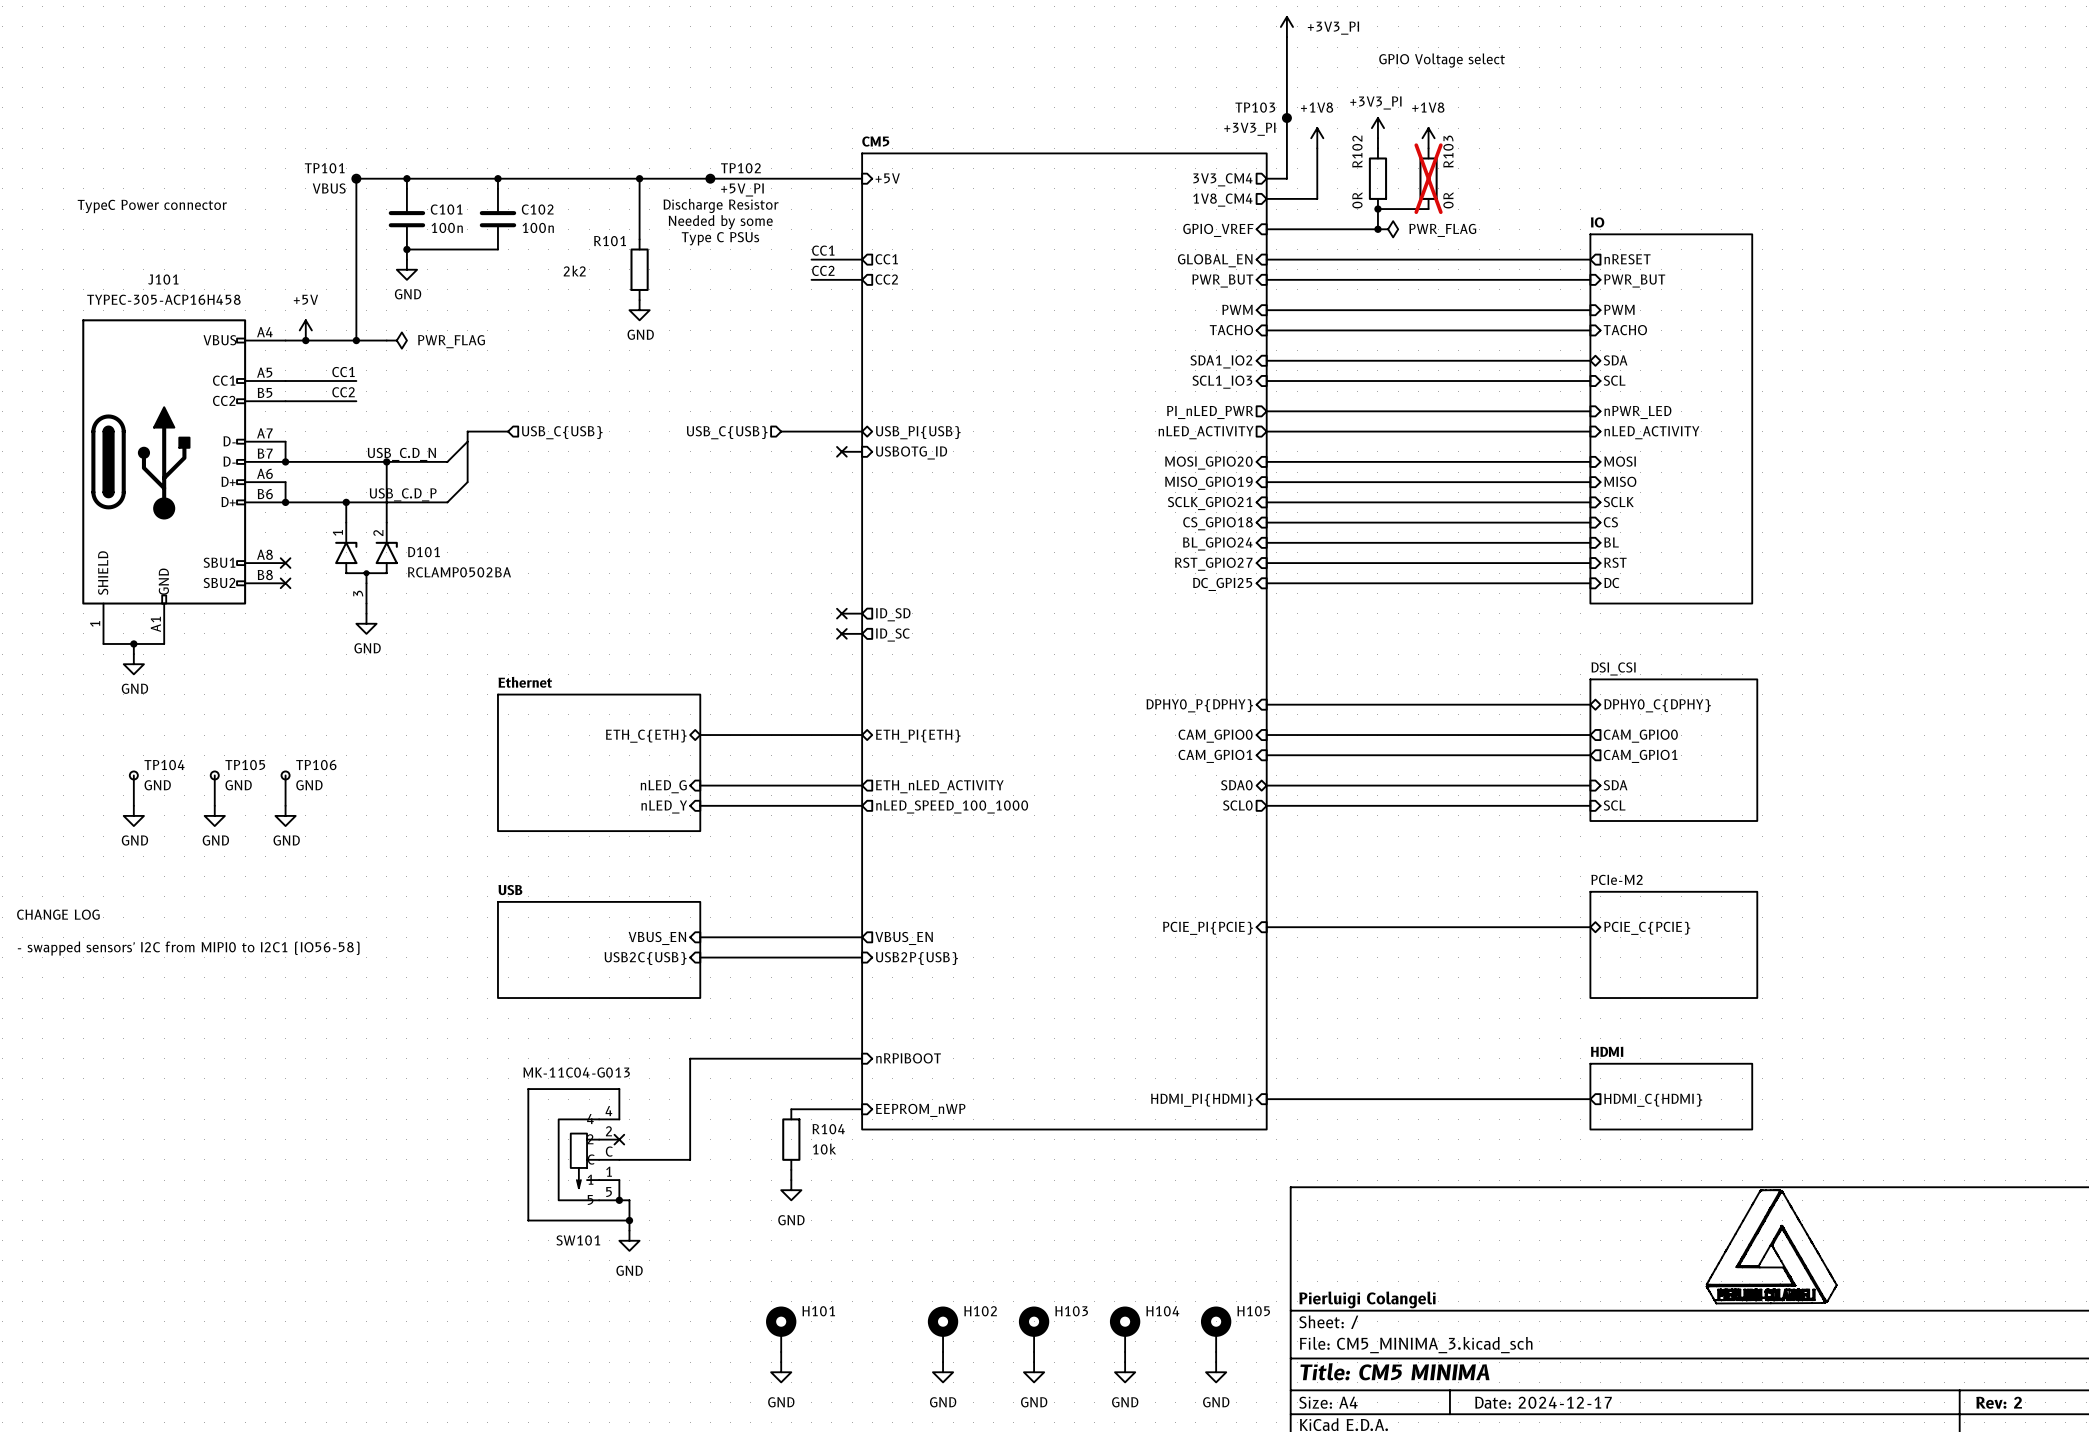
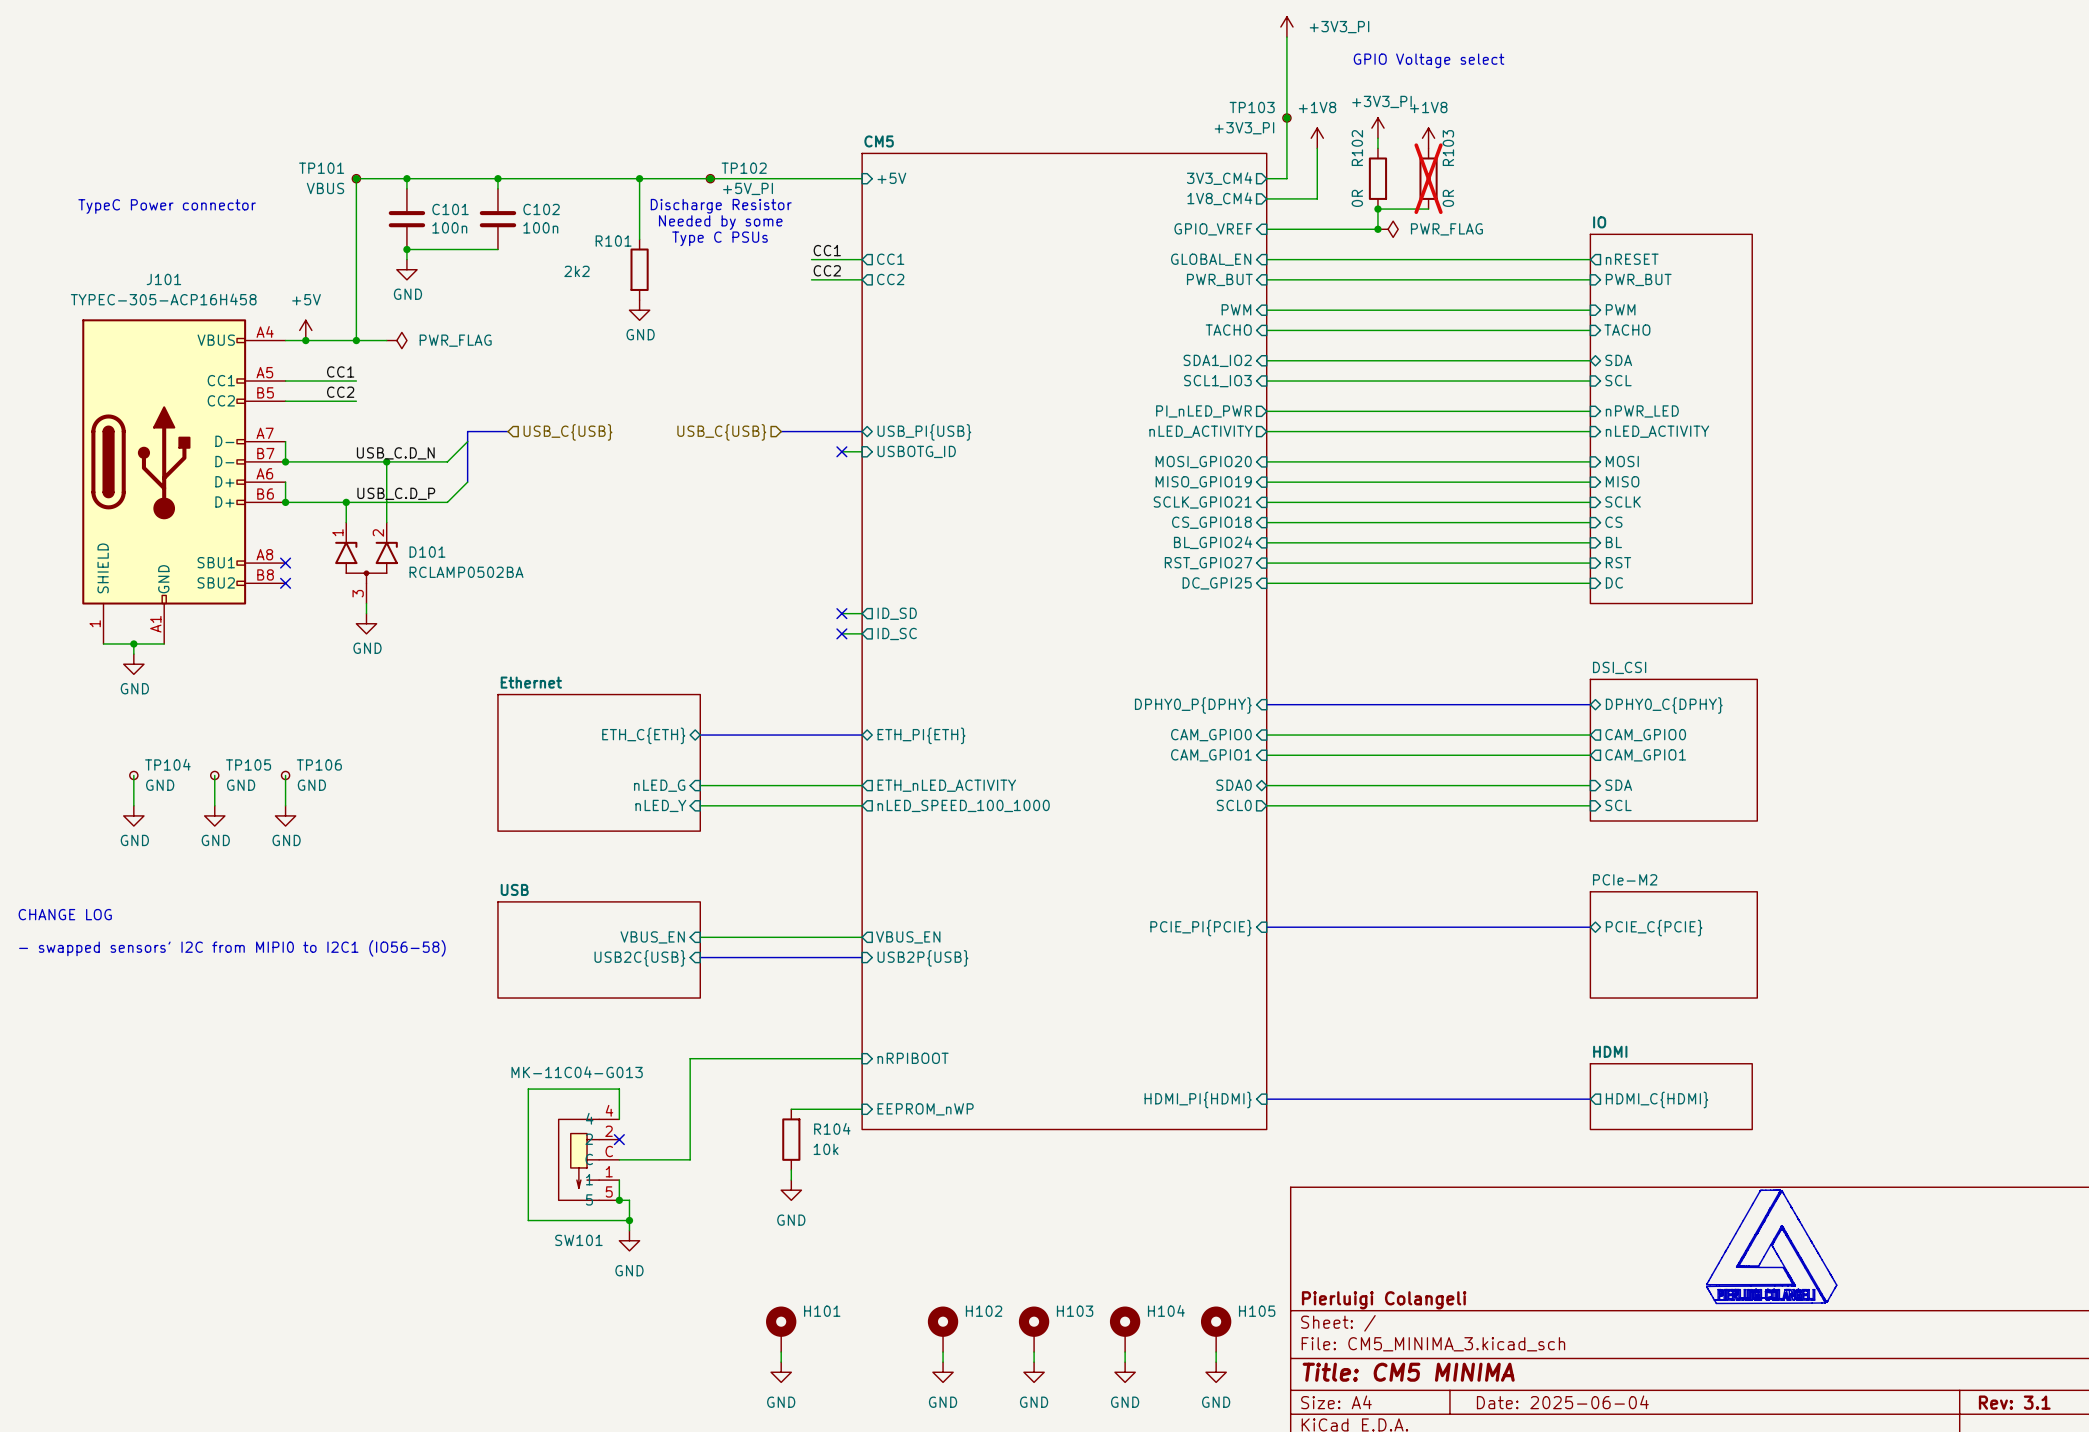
title block: Date: 2024-12-17 (1543, 1402) -> Date: 2025-06-04 (1562, 1402)
title block: Rev: 2 (1999, 1402) -> Rev: 3.1 (2014, 1402)

